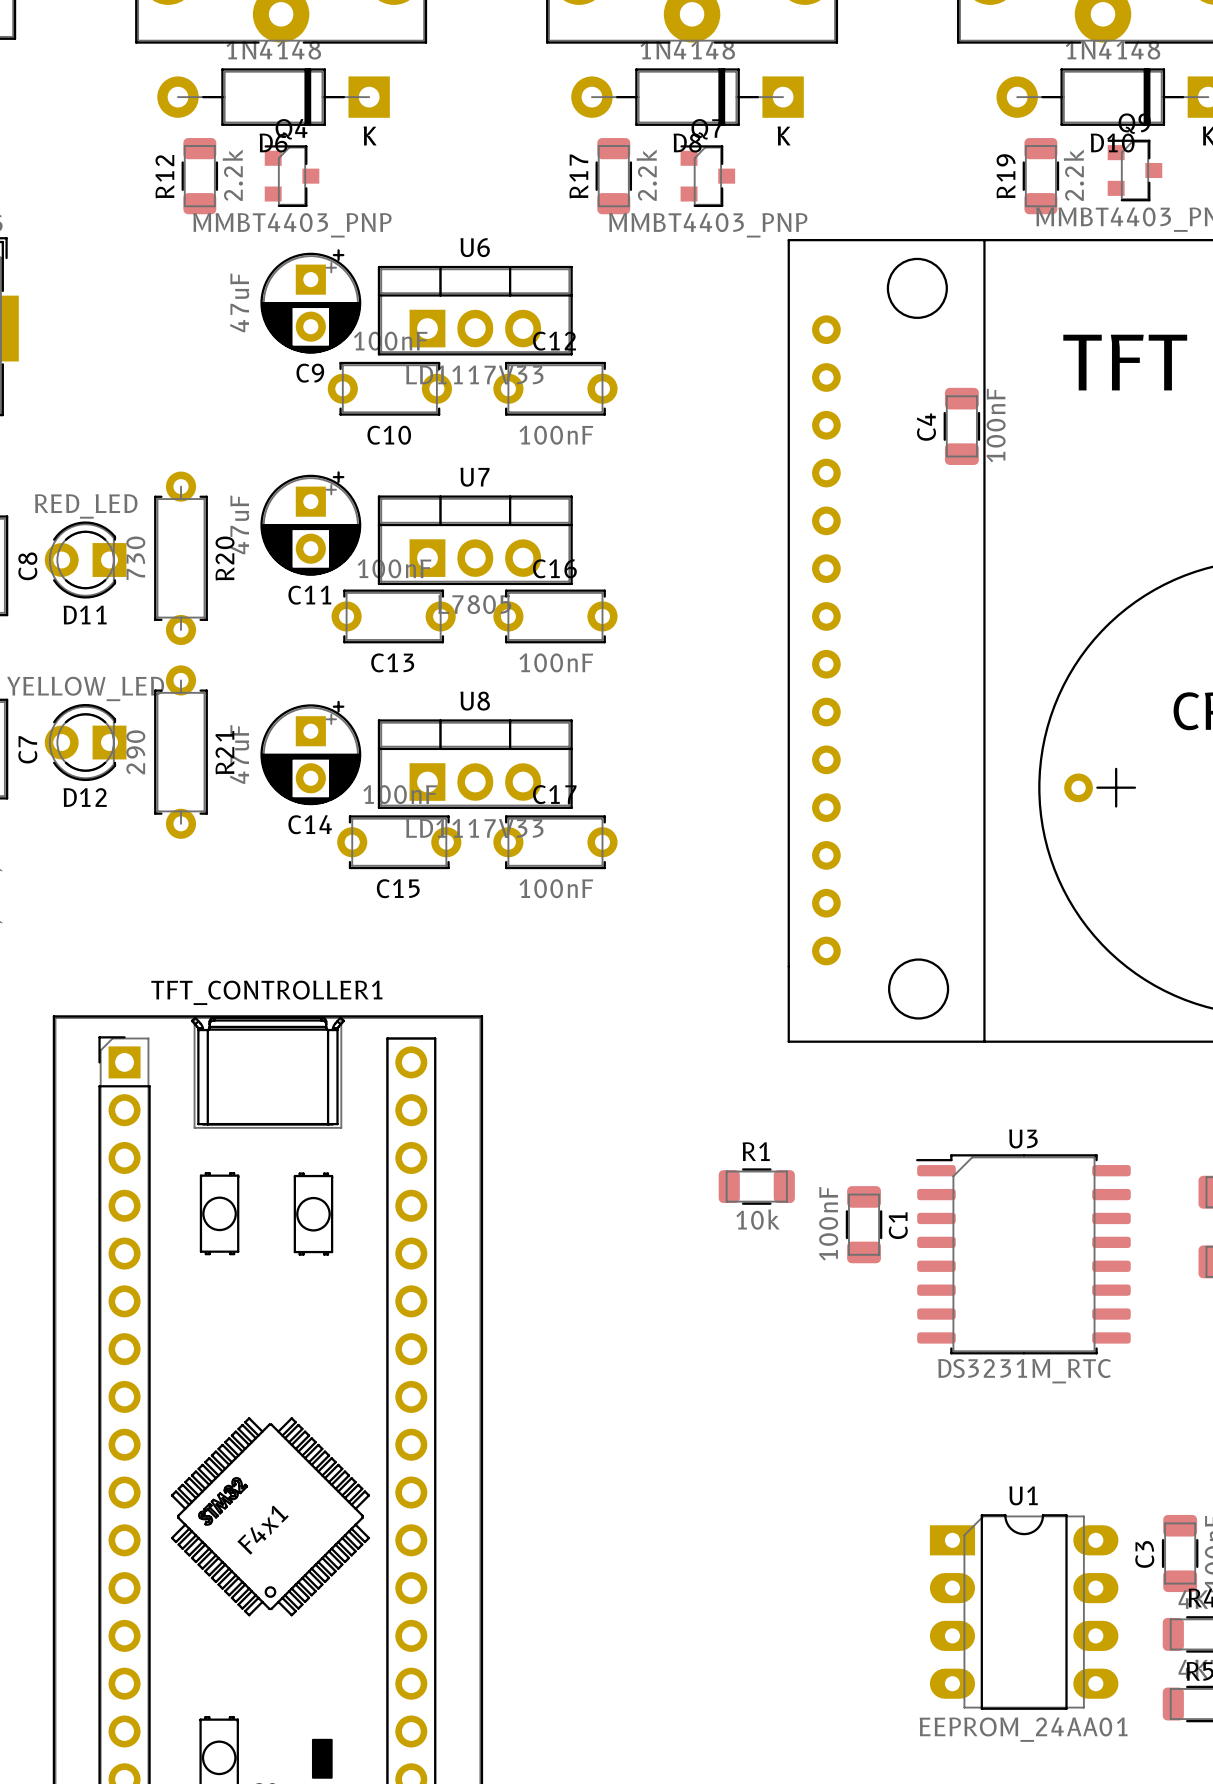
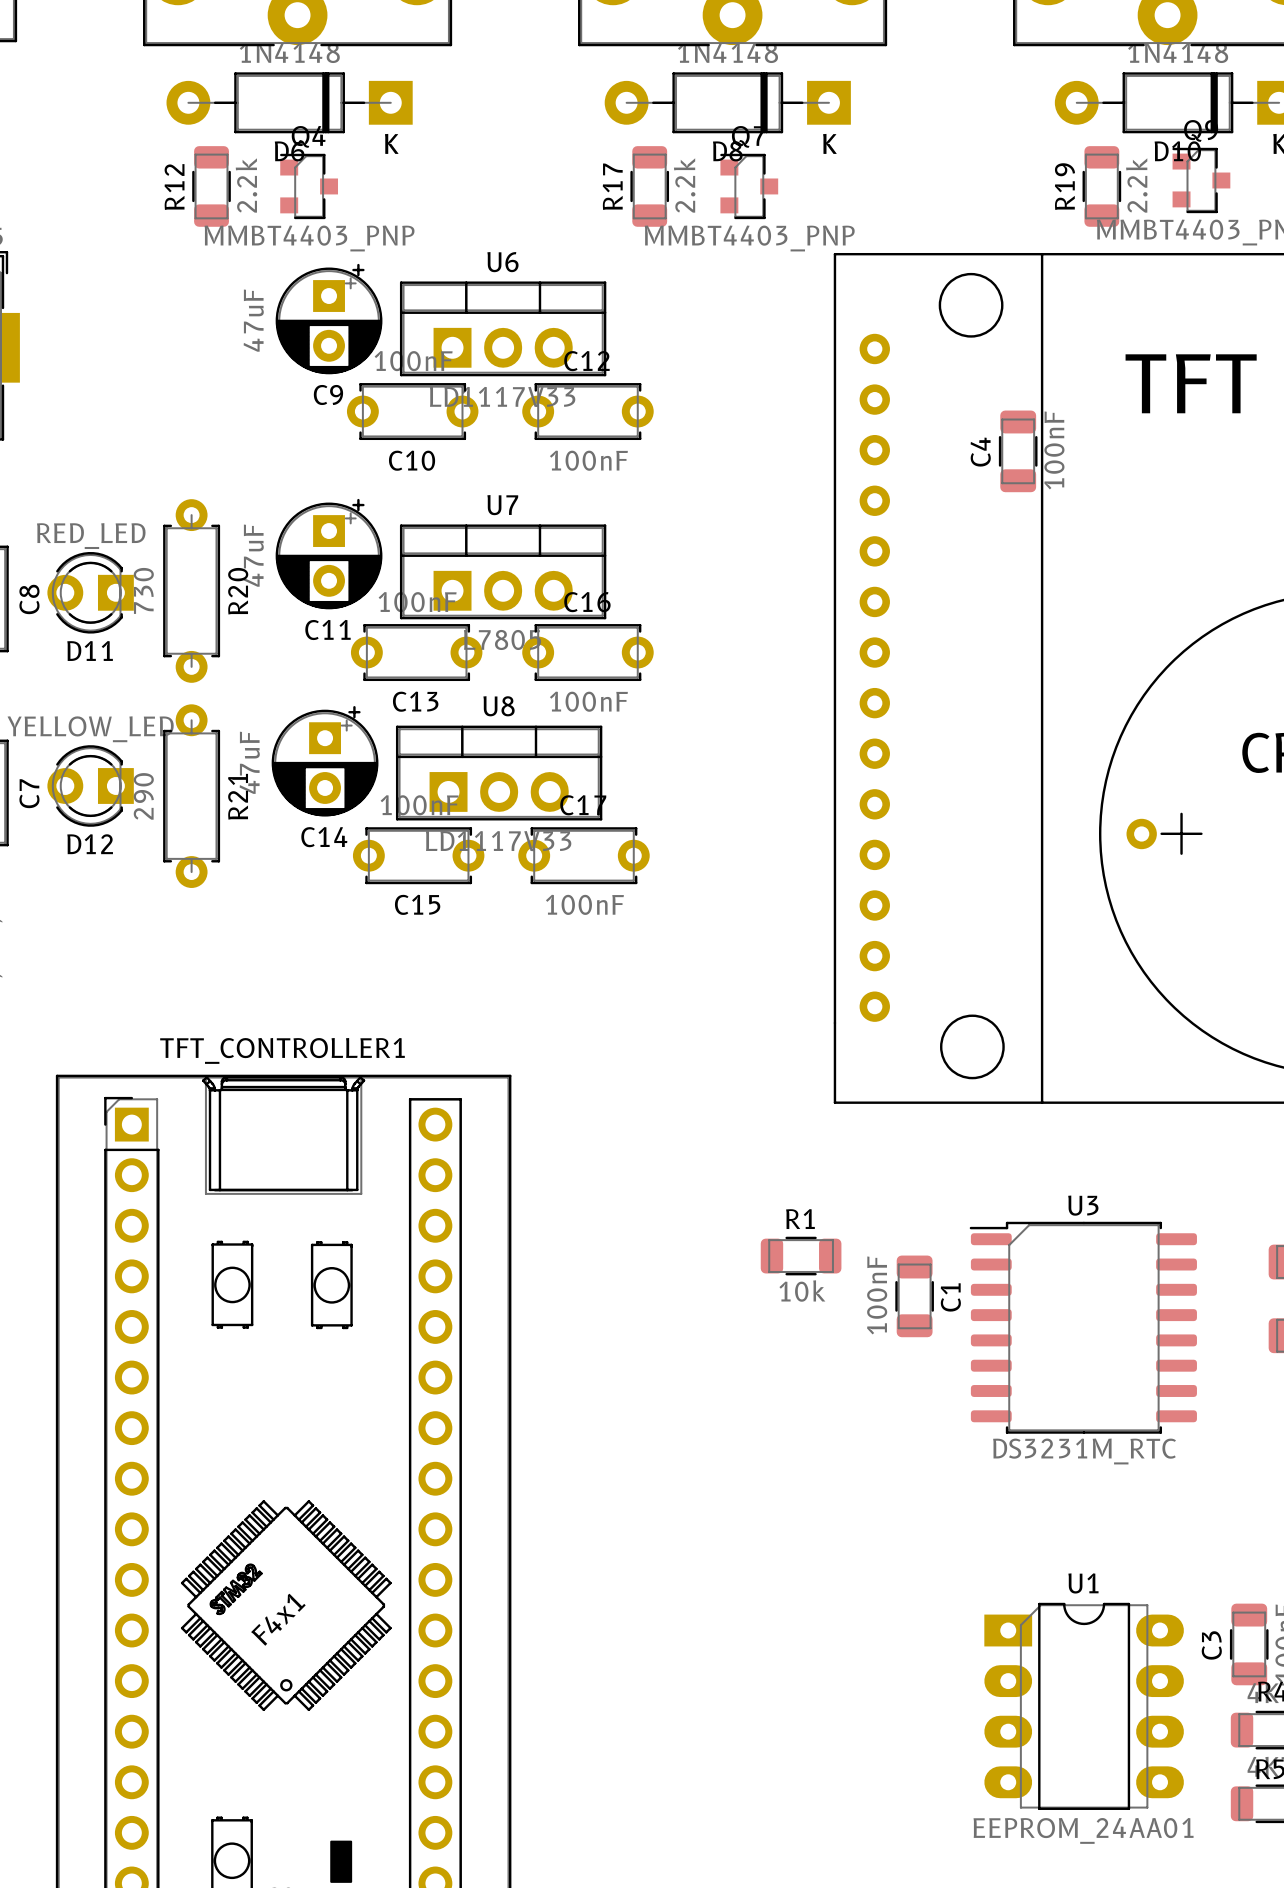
C14 position: (310, 753) -> (325, 761)
U8 position: (475, 764) -> (499, 773)
C15 position: (399, 842) -> (418, 855)
C17 position: (555, 842) -> (583, 855)

